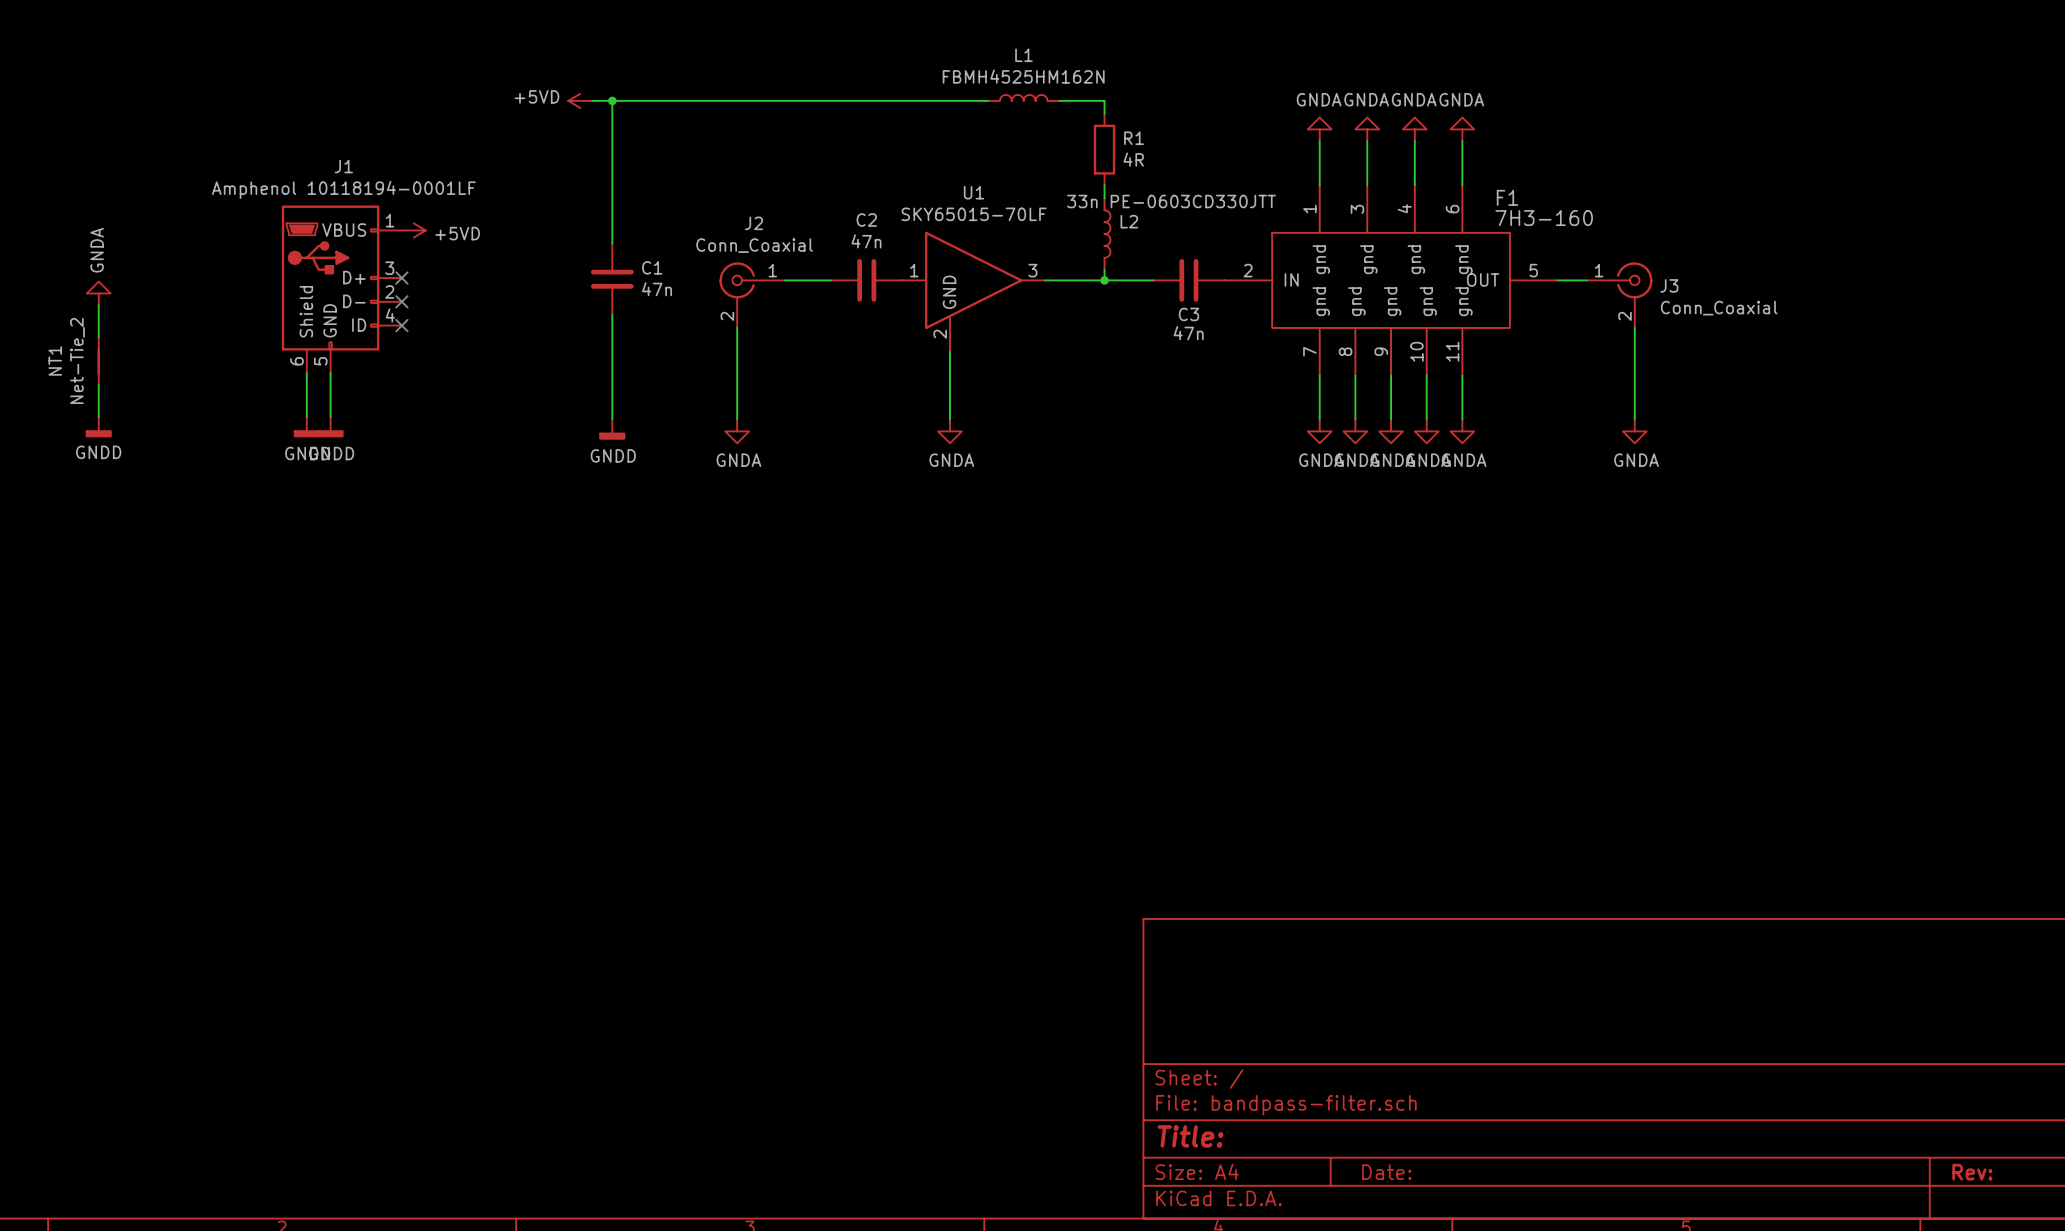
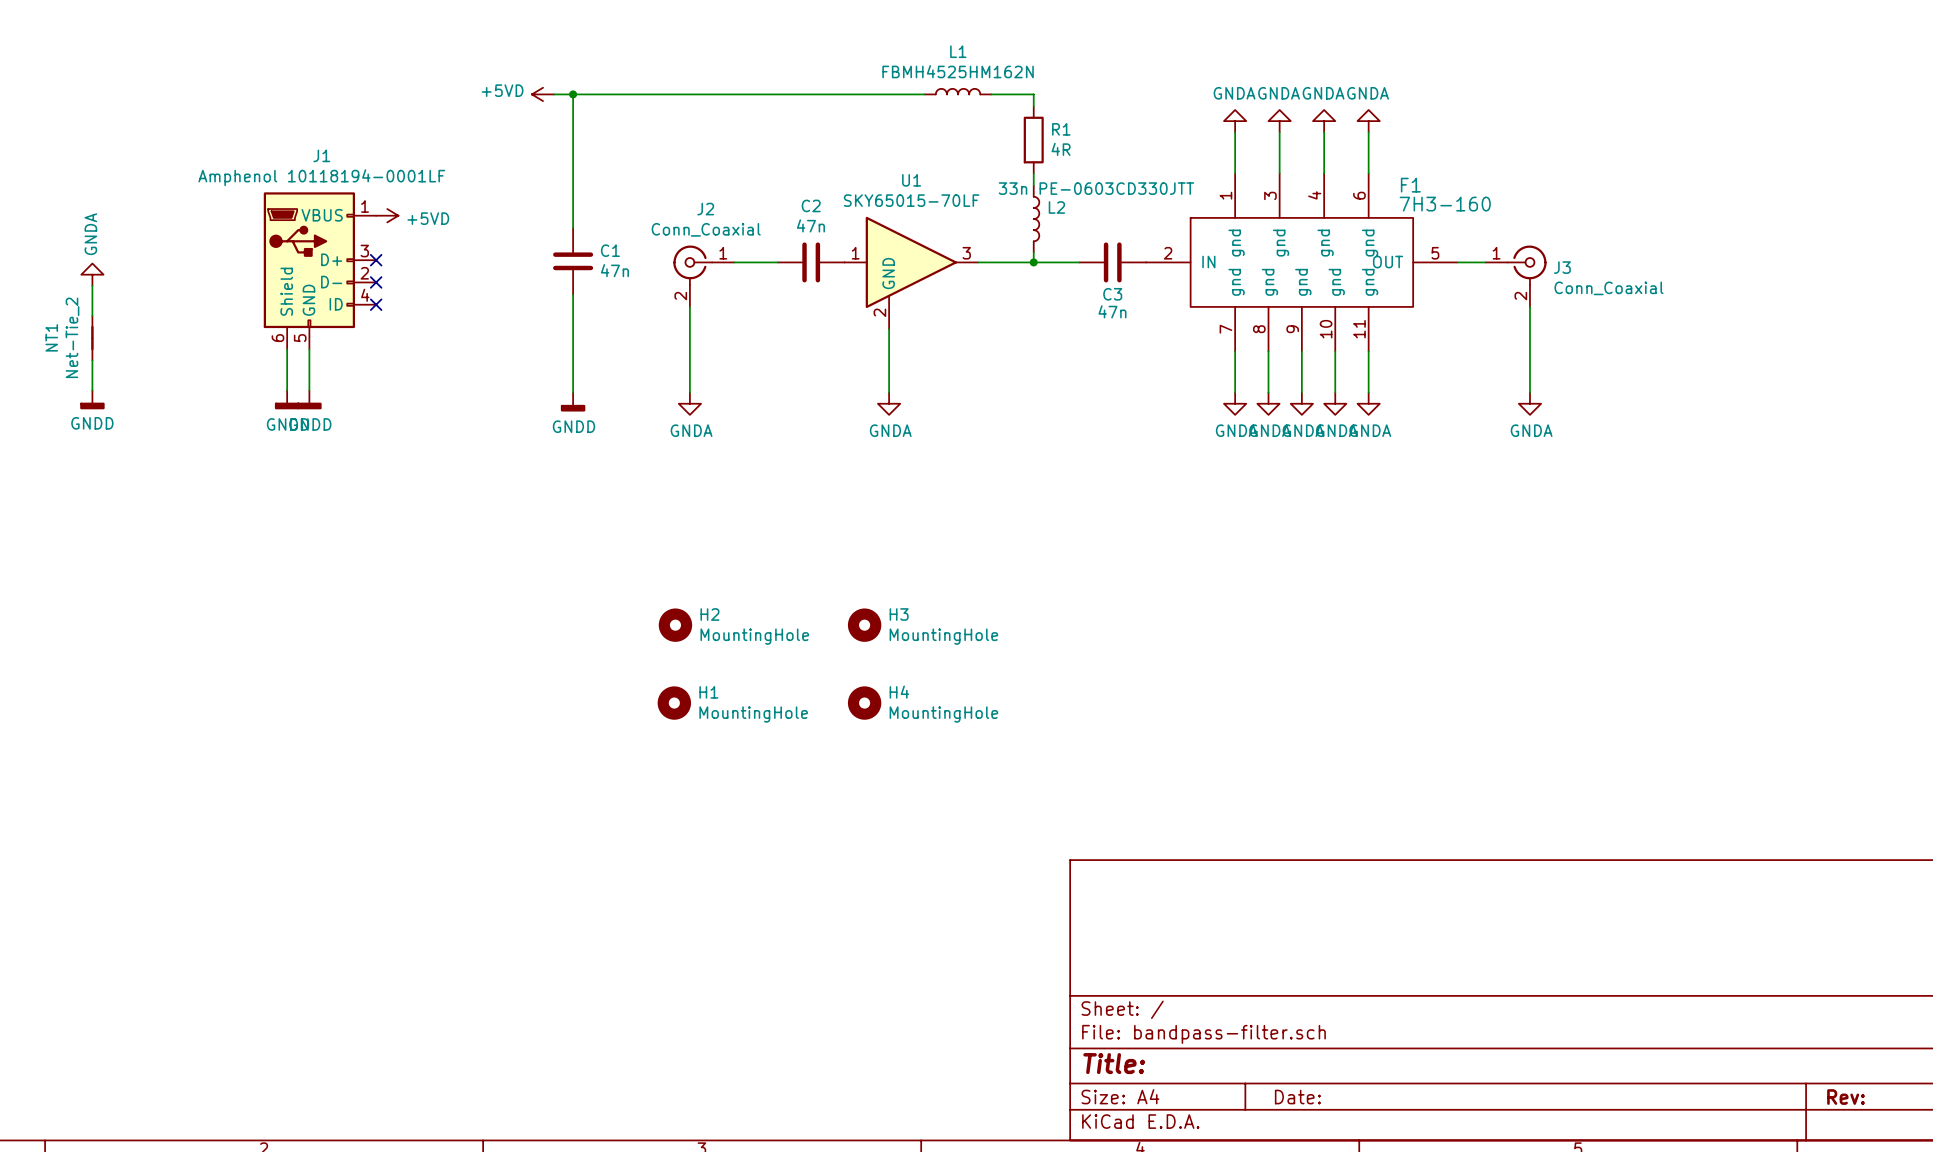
H2: none -> MountingHole (675, 625)
H3: none -> MountingHole (864, 625)
H1: none -> MountingHole (674, 703)
H4: none -> MountingHole (864, 703)

